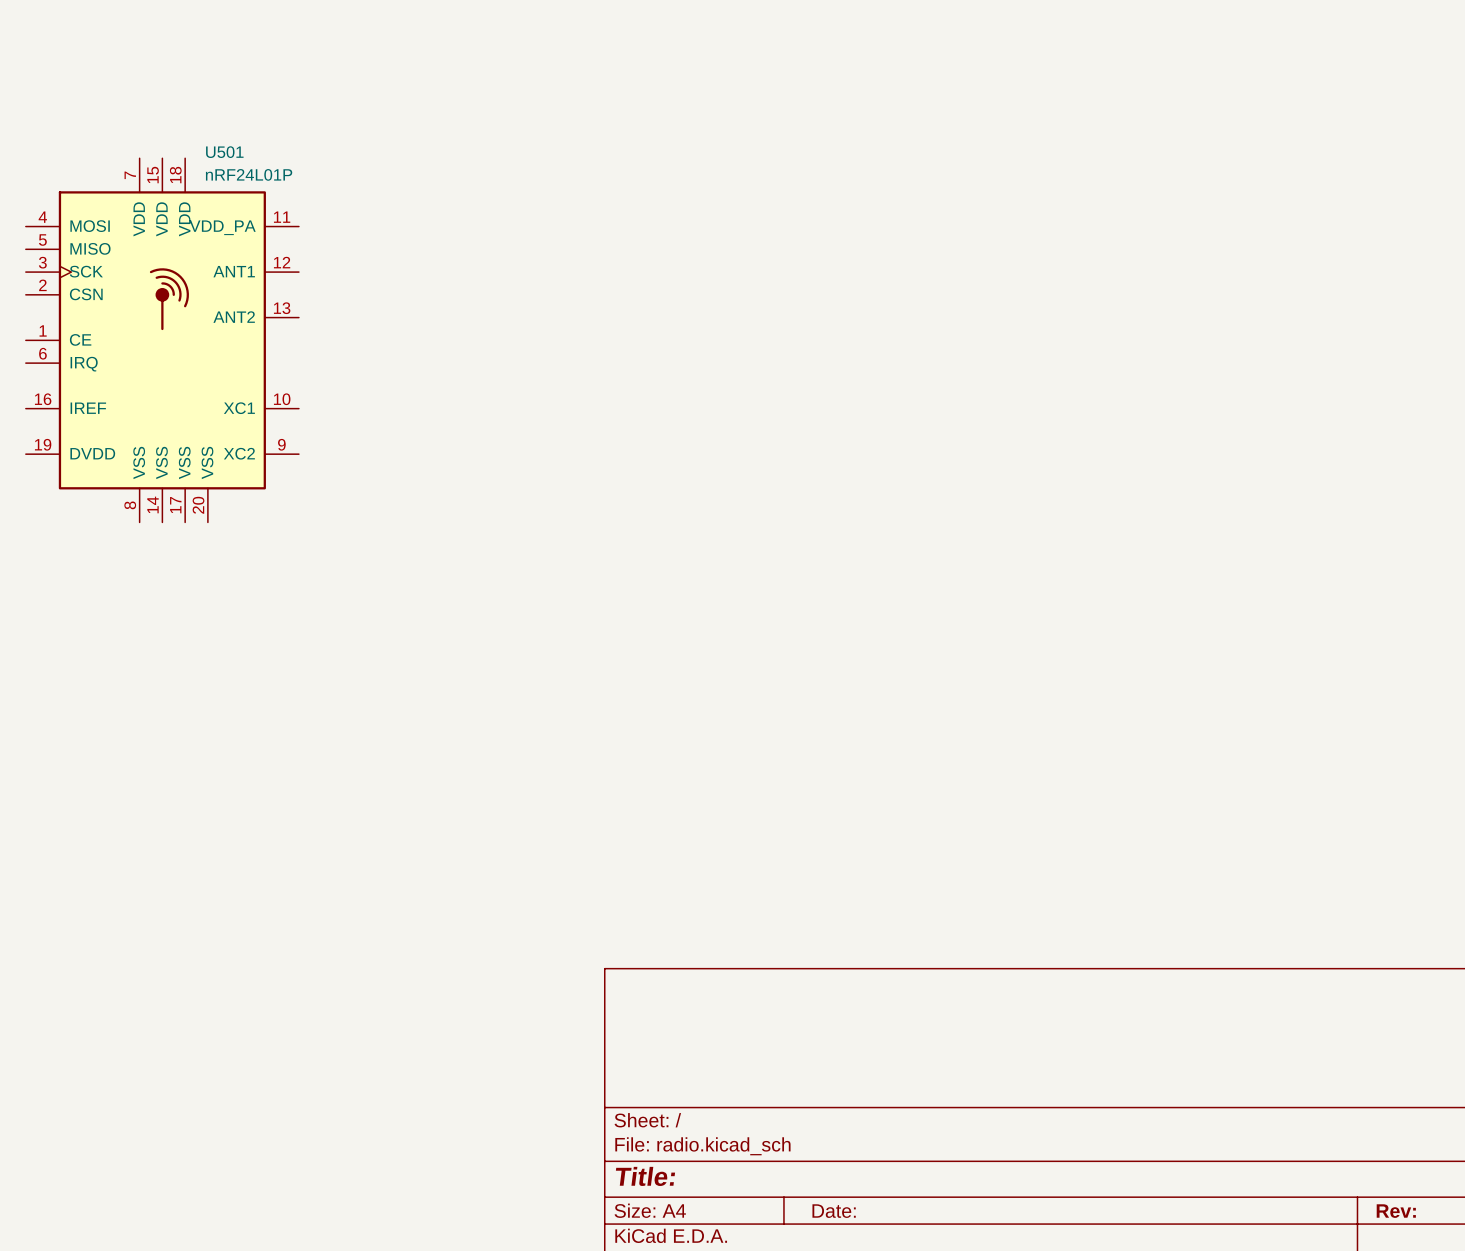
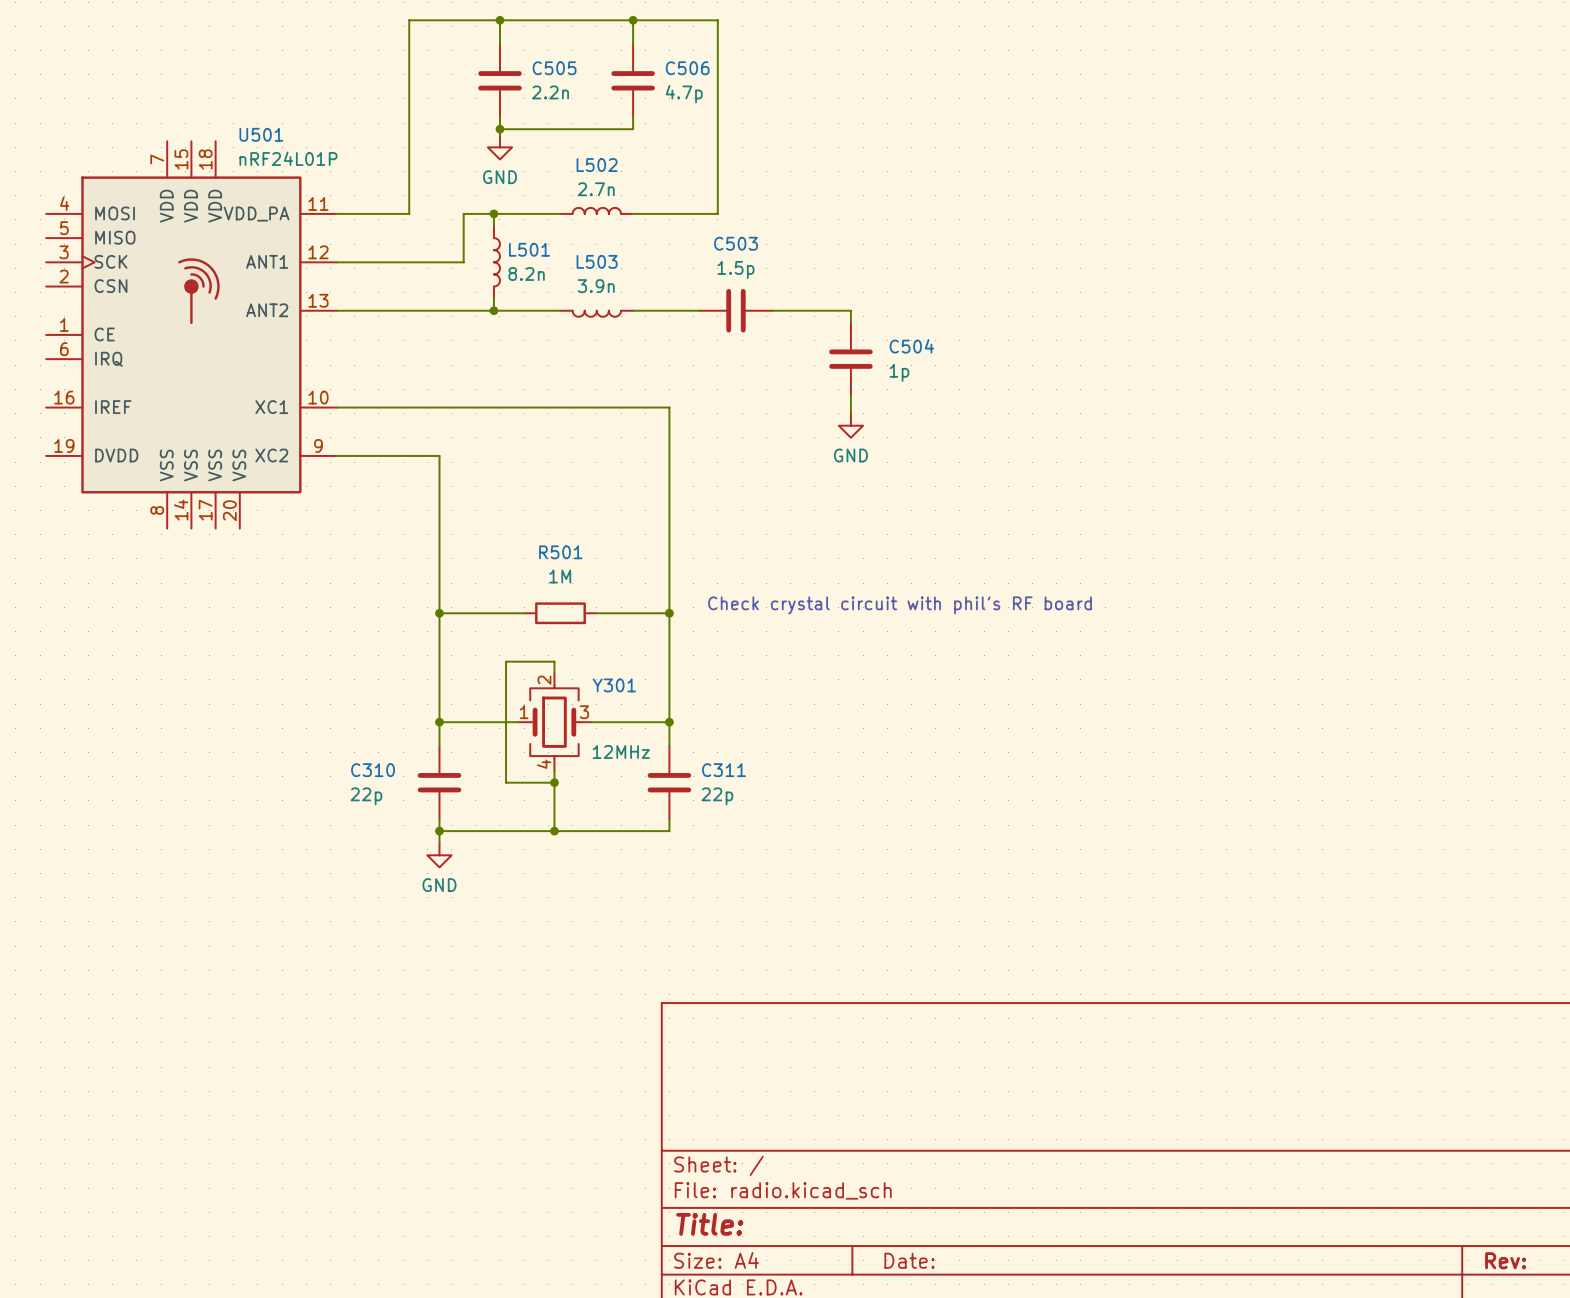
wire: none -> (499, 20) (499, 44)
junction: none -> (499, 20)
wire: none -> (633, 20) (633, 44)
junction: none -> (633, 20)
C505: none -> 2.2n (499, 80)
C506: none -> 4.7p (633, 80)
wire: none -> (499, 117) (499, 135)
wire: none -> (633, 117) (633, 129) (499, 129)
junction: none -> (499, 129)
power symbol: none -> GND (499, 147)
L502: none -> 2.7n (596, 210)
wire: none -> (336, 213) (409, 213) (409, 20) (717, 20) (717, 213) (633, 213)
wire: none -> (493, 213) (493, 226)
junction: none -> (493, 213)
wire: none -> (560, 213) (463, 213) (463, 262) (336, 262)
L501: none -> 8.2n (496, 262)
wire: none -> (493, 298) (493, 310)
wire: none -> (336, 310) (560, 310)
junction: none -> (493, 310)
wire: none -> (633, 310) (699, 310)
C503: none -> 1.5p (735, 310)
wire: none -> (772, 310) (850, 310) (850, 322)
L503: none -> 3.9n (596, 313)
C504: none -> 1p (850, 359)
wire: none -> (850, 395) (850, 413)
wire: none -> (336, 407) (669, 407) (669, 746)
power symbol: none -> GND (850, 425)
wire: none -> (336, 455) (439, 455) (439, 746)
text: none -> Check crystal circuit with phil's RF board (900, 605)
wire: none -> (439, 613) (524, 613)
junction: none -> (439, 613)
R501: none -> 1M (560, 613)
wire: none -> (596, 613) (669, 613)
junction: none -> (669, 613)
wire: none -> (554, 673) (554, 661) (506, 661) (506, 782) (554, 782)
wire: none -> (439, 722) (518, 722)
junction: none -> (439, 722)
Y301: none -> 12MHz (554, 722)
wire: none -> (590, 722) (669, 722)
junction: none -> (669, 722)
wire: none -> (554, 770) (554, 831)
C310: none -> 22p (439, 782)
junction: none -> (554, 782)
C311: none -> 22p (669, 782)
wire: none -> (439, 819) (439, 843)
wire: none -> (669, 819) (669, 831) (439, 831)
junction: none -> (439, 831)
junction: none -> (554, 831)
power symbol: none -> GND (439, 855)

